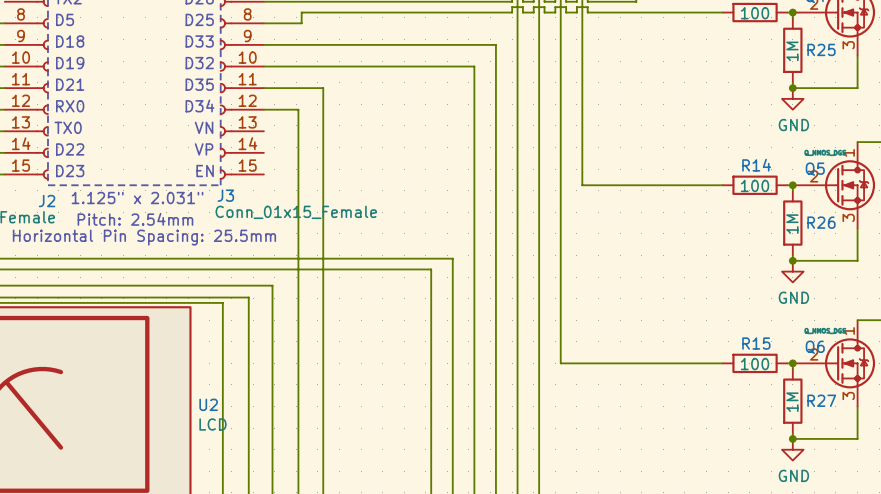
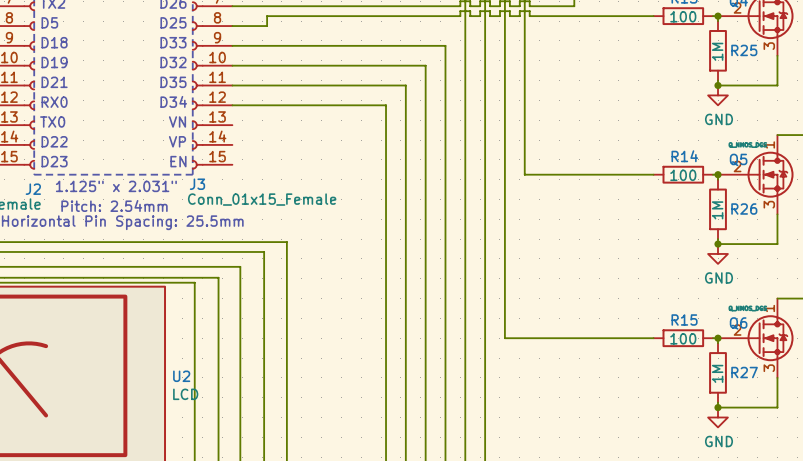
wire: (323, 88) (323, 258) (452, 258) -> (286, 85) (405, 85) (405, 242)
wire: (298, 109) (298, 269) (431, 269) -> (264, 105) (386, 105) (386, 251)

